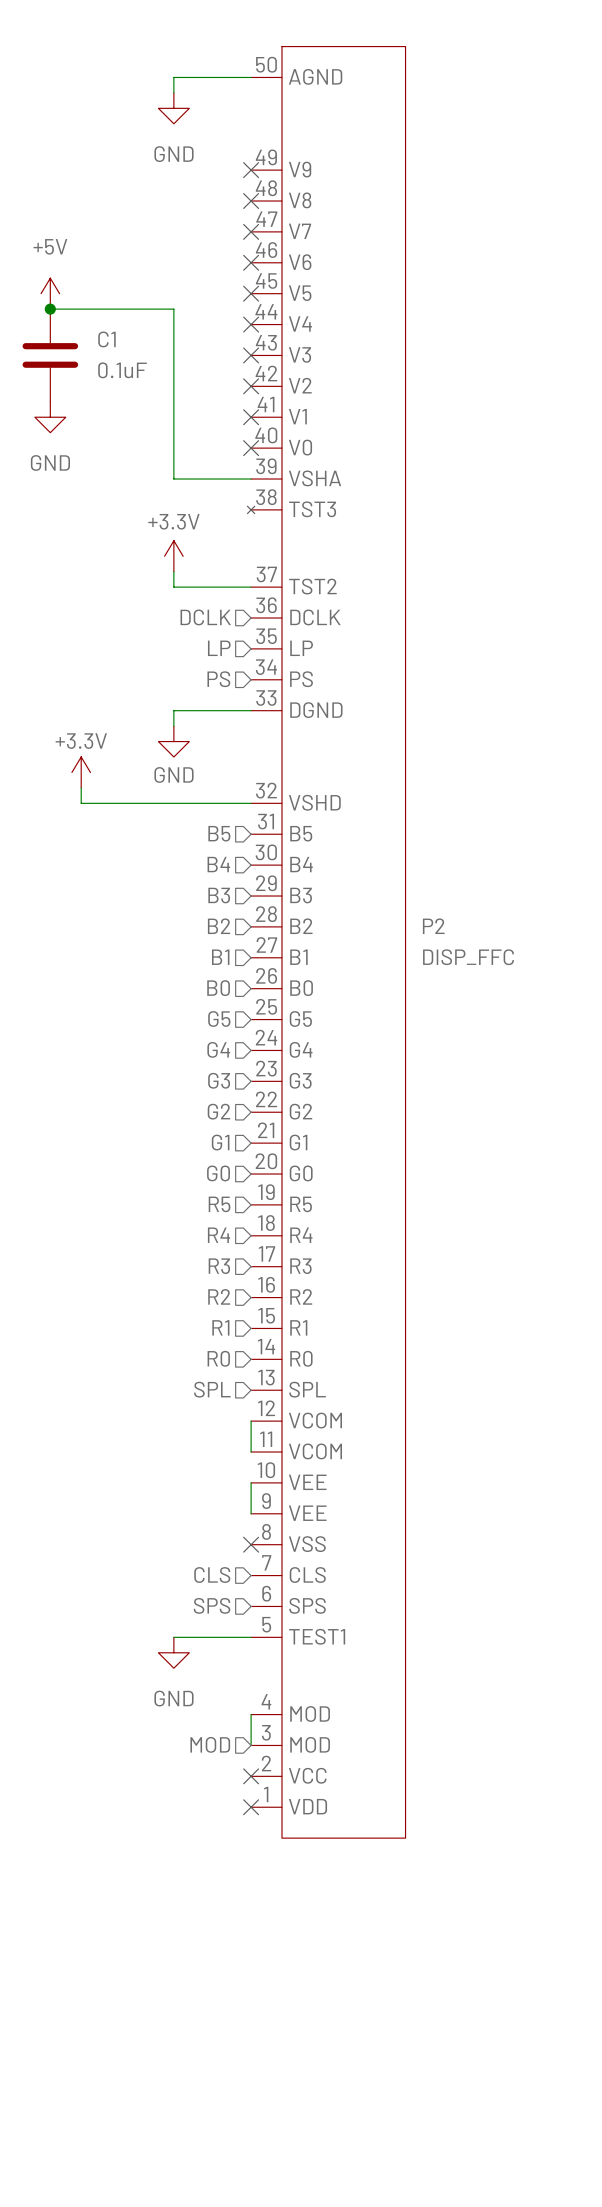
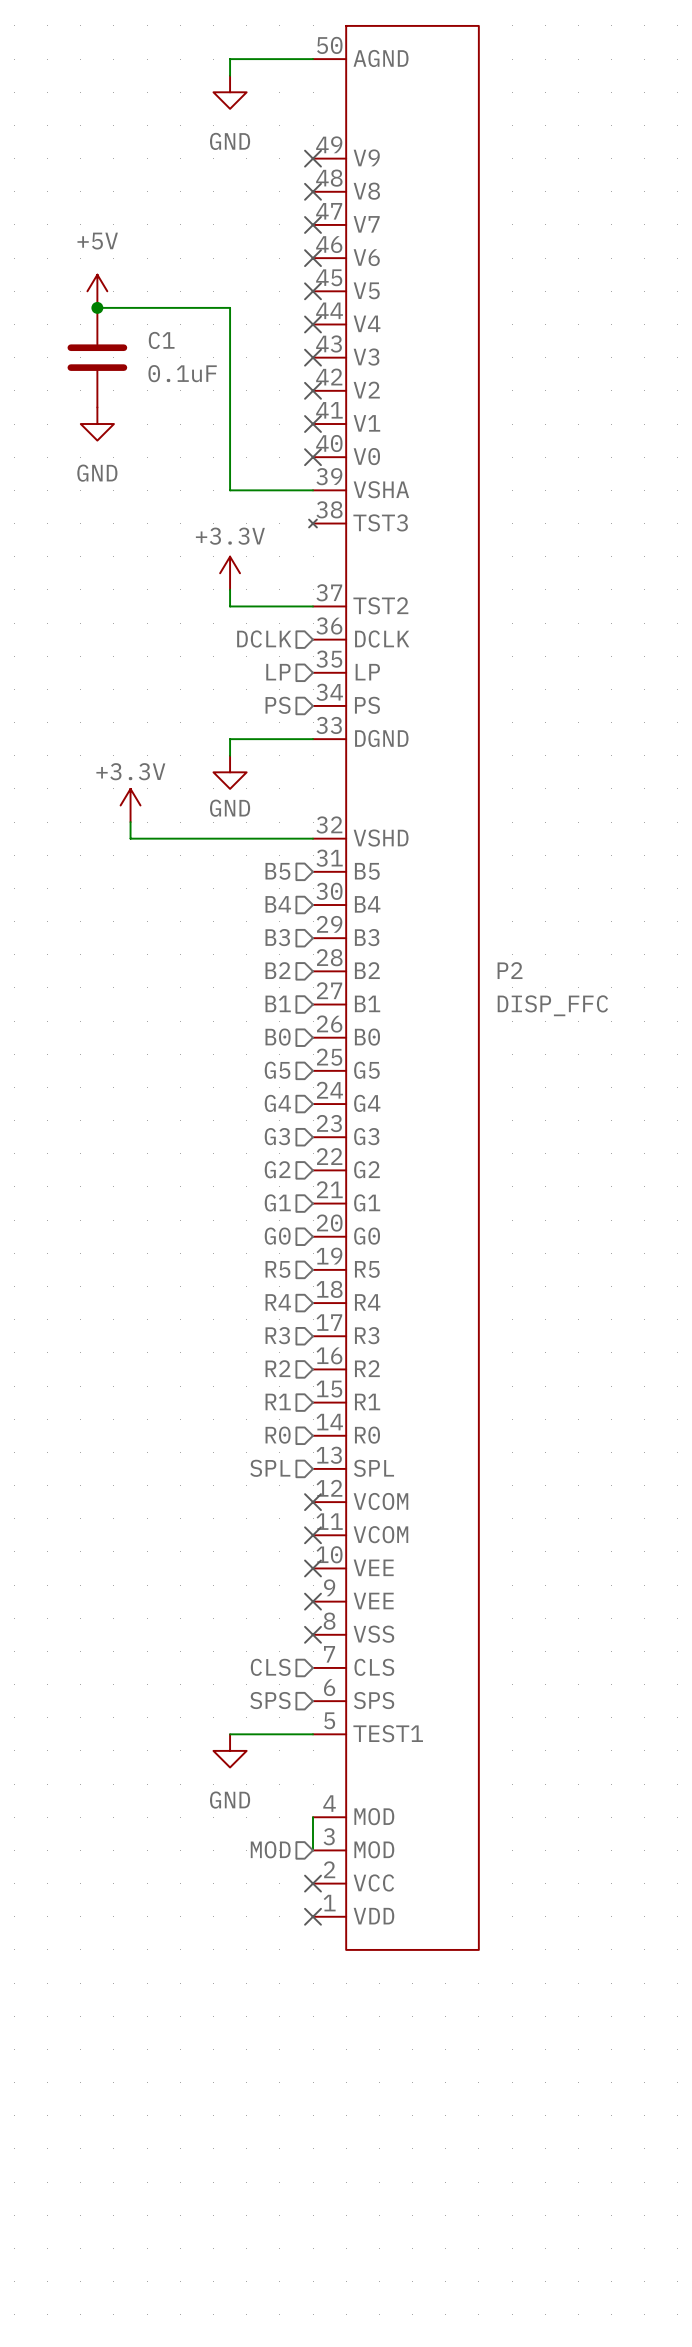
wire: (251, 1421) (251, 1452) -> none
no-connect mark: none -> (313, 1502)
no-connect mark: none -> (313, 1535)
wire: (251, 1482) (251, 1513) -> none
no-connect mark: none -> (313, 1568)
no-connect mark: none -> (313, 1601)

